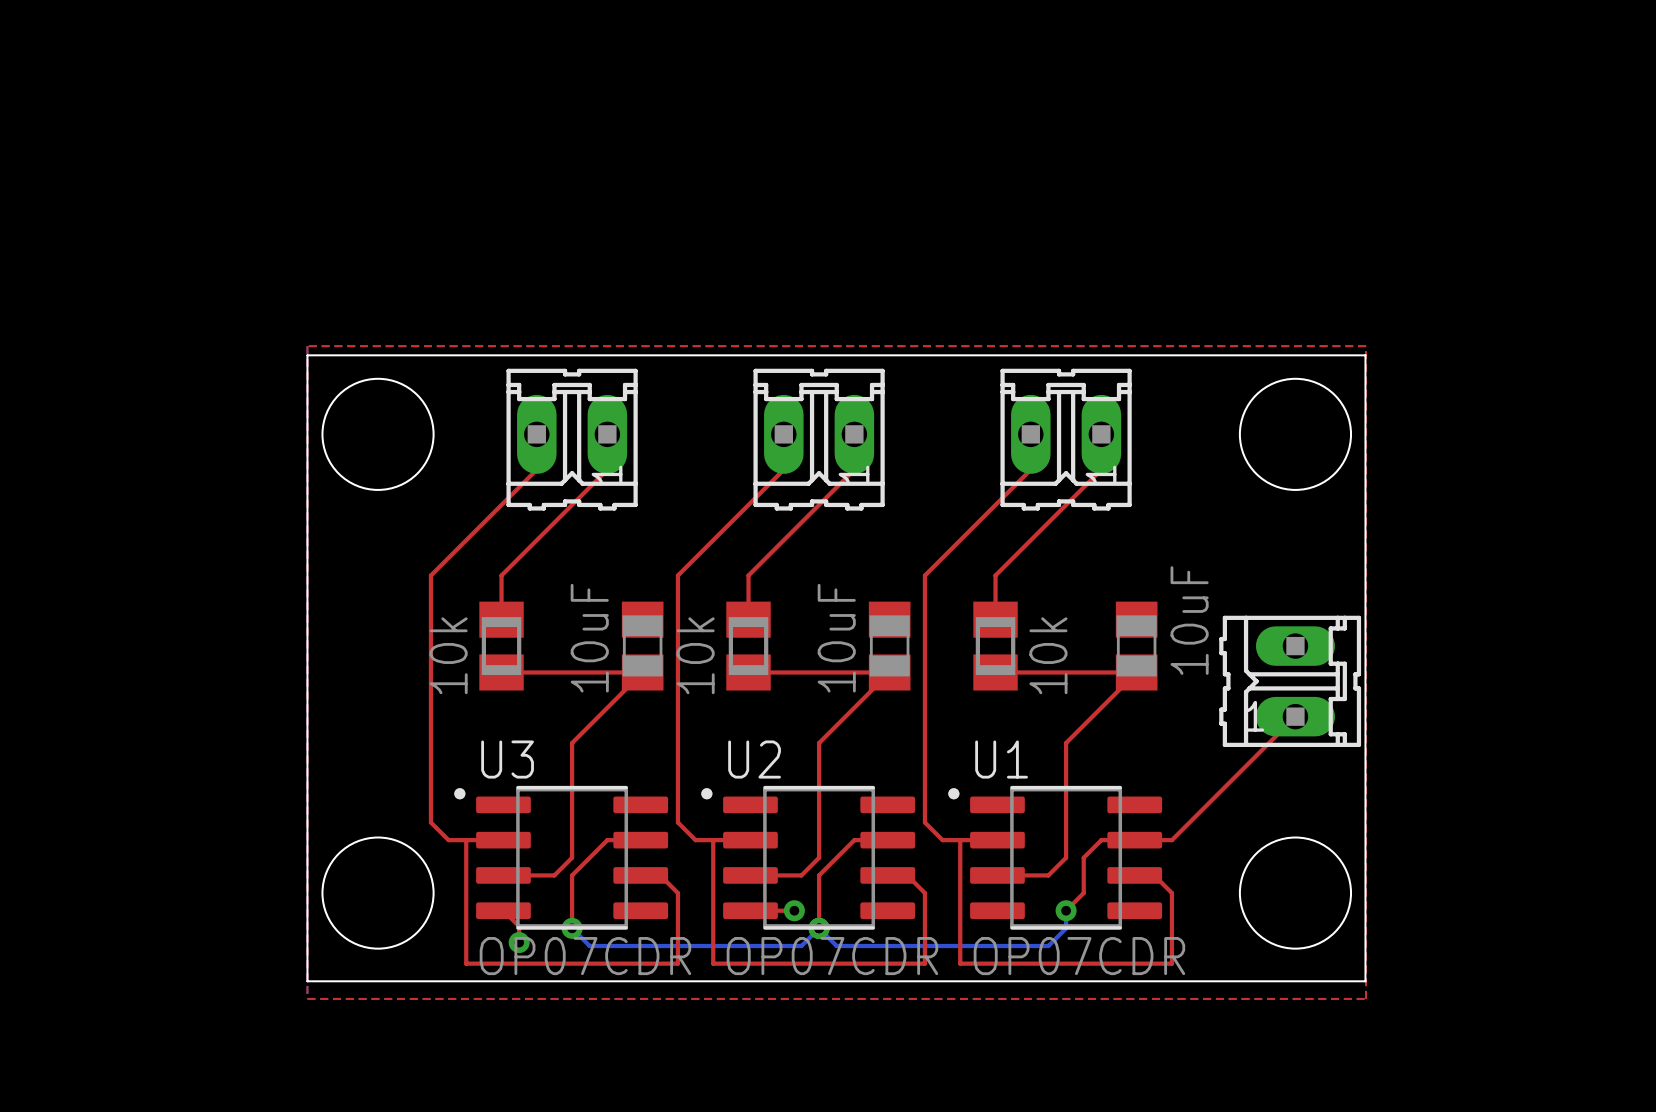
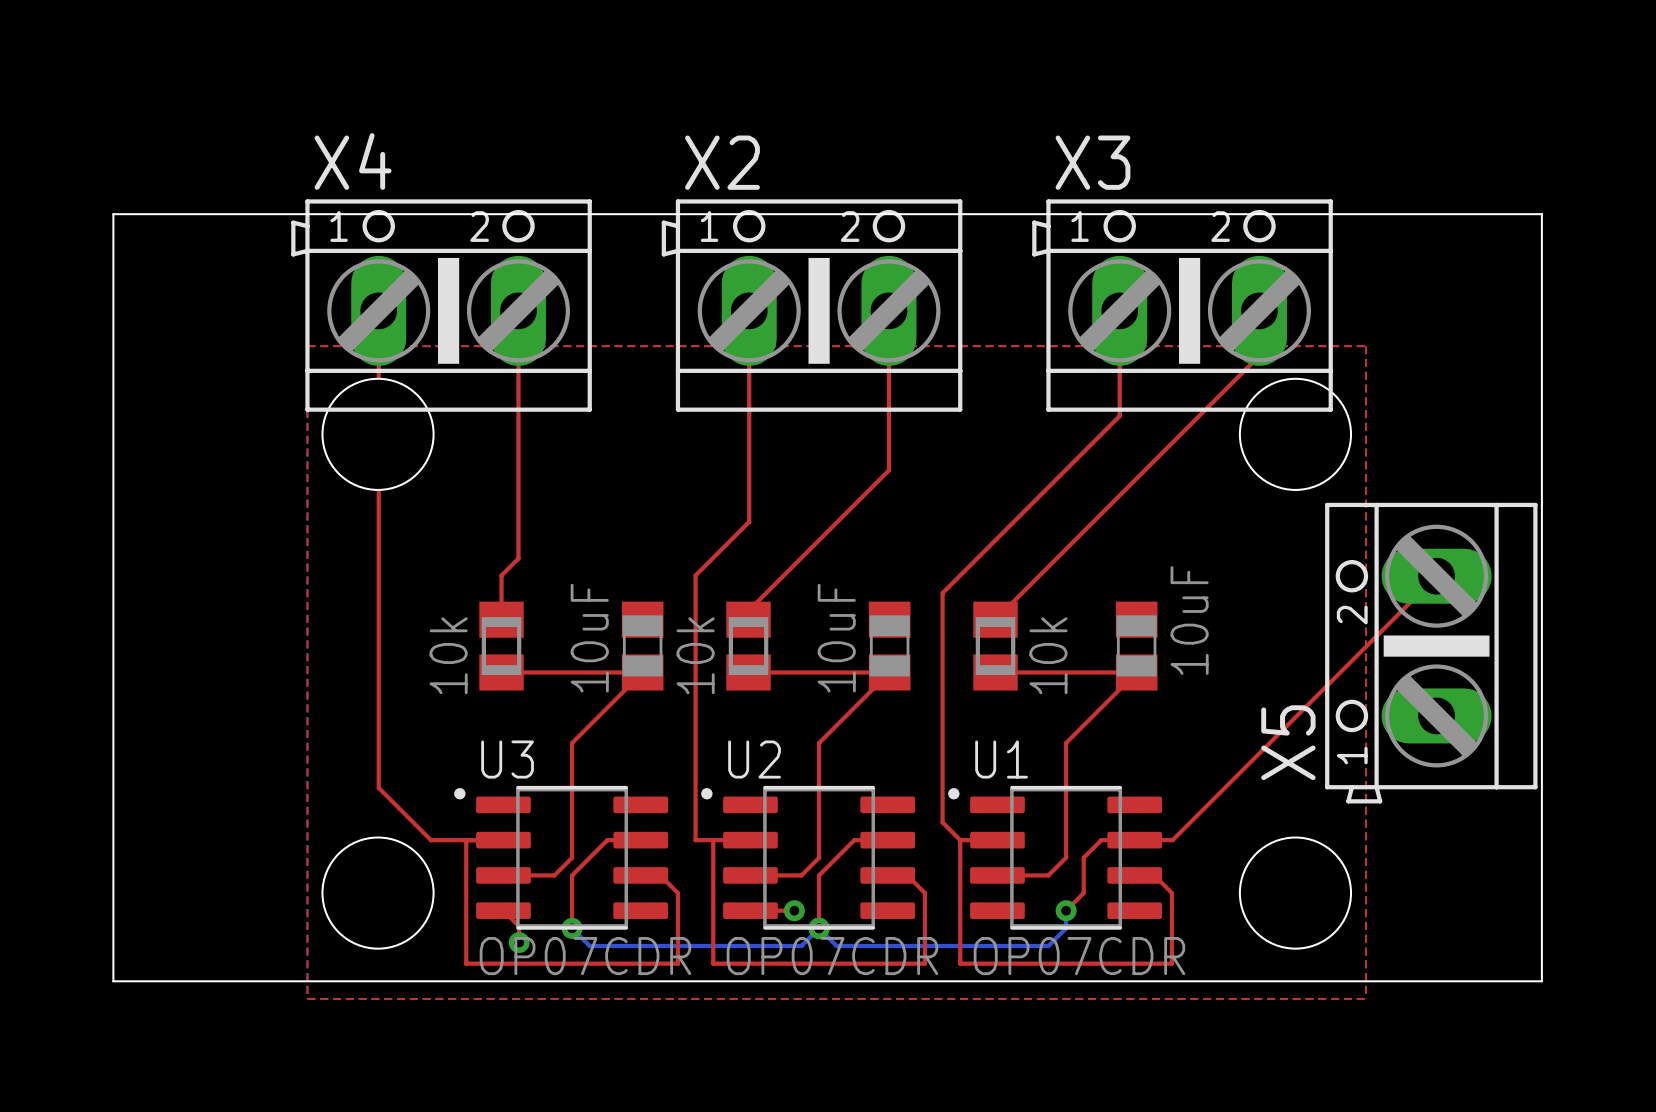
X4: none -> (441, 305)
X2: none -> (812, 305)
X3: none -> (1182, 305)
top track: (536, 434) (536, 469) (430, 575) (430, 822) (448, 840) -> (378, 310) (378, 787) (430, 840) (448, 840)
top track: (607, 434) (607, 469) (518, 558) -> (518, 310) (518, 558)
top track: (783, 434) (783, 469) (677, 575) (677, 822) (695, 840) -> (749, 310) (749, 521) (695, 575) (695, 840)
top track: (854, 434) (854, 469) (748, 575) (748, 610) -> (888, 310) (888, 470) (748, 610)
top track: (1030, 434) (1030, 469) (924, 575) (924, 822) (942, 840) (960, 840) -> (1119, 310) (1119, 416) (942, 593) (942, 822) (960, 840)
top track: (1101, 434) (1101, 469) (995, 575) (995, 619) -> (1259, 310) (1259, 355) (995, 619)
part: (572, 439) -> none
part: (819, 439) -> none
part: (1066, 439) -> none
X5: none -> (1431, 653)
part: (1290, 681) -> none
top track: (1295, 716) (1171, 840) -> (1436, 576) (1171, 840)
board edge: (307, 981) (307, 355) (1365, 355) (1365, 981) -> (307, 981) (113, 981) (113, 214) (1541, 214) (1541, 981) (1365, 981)

